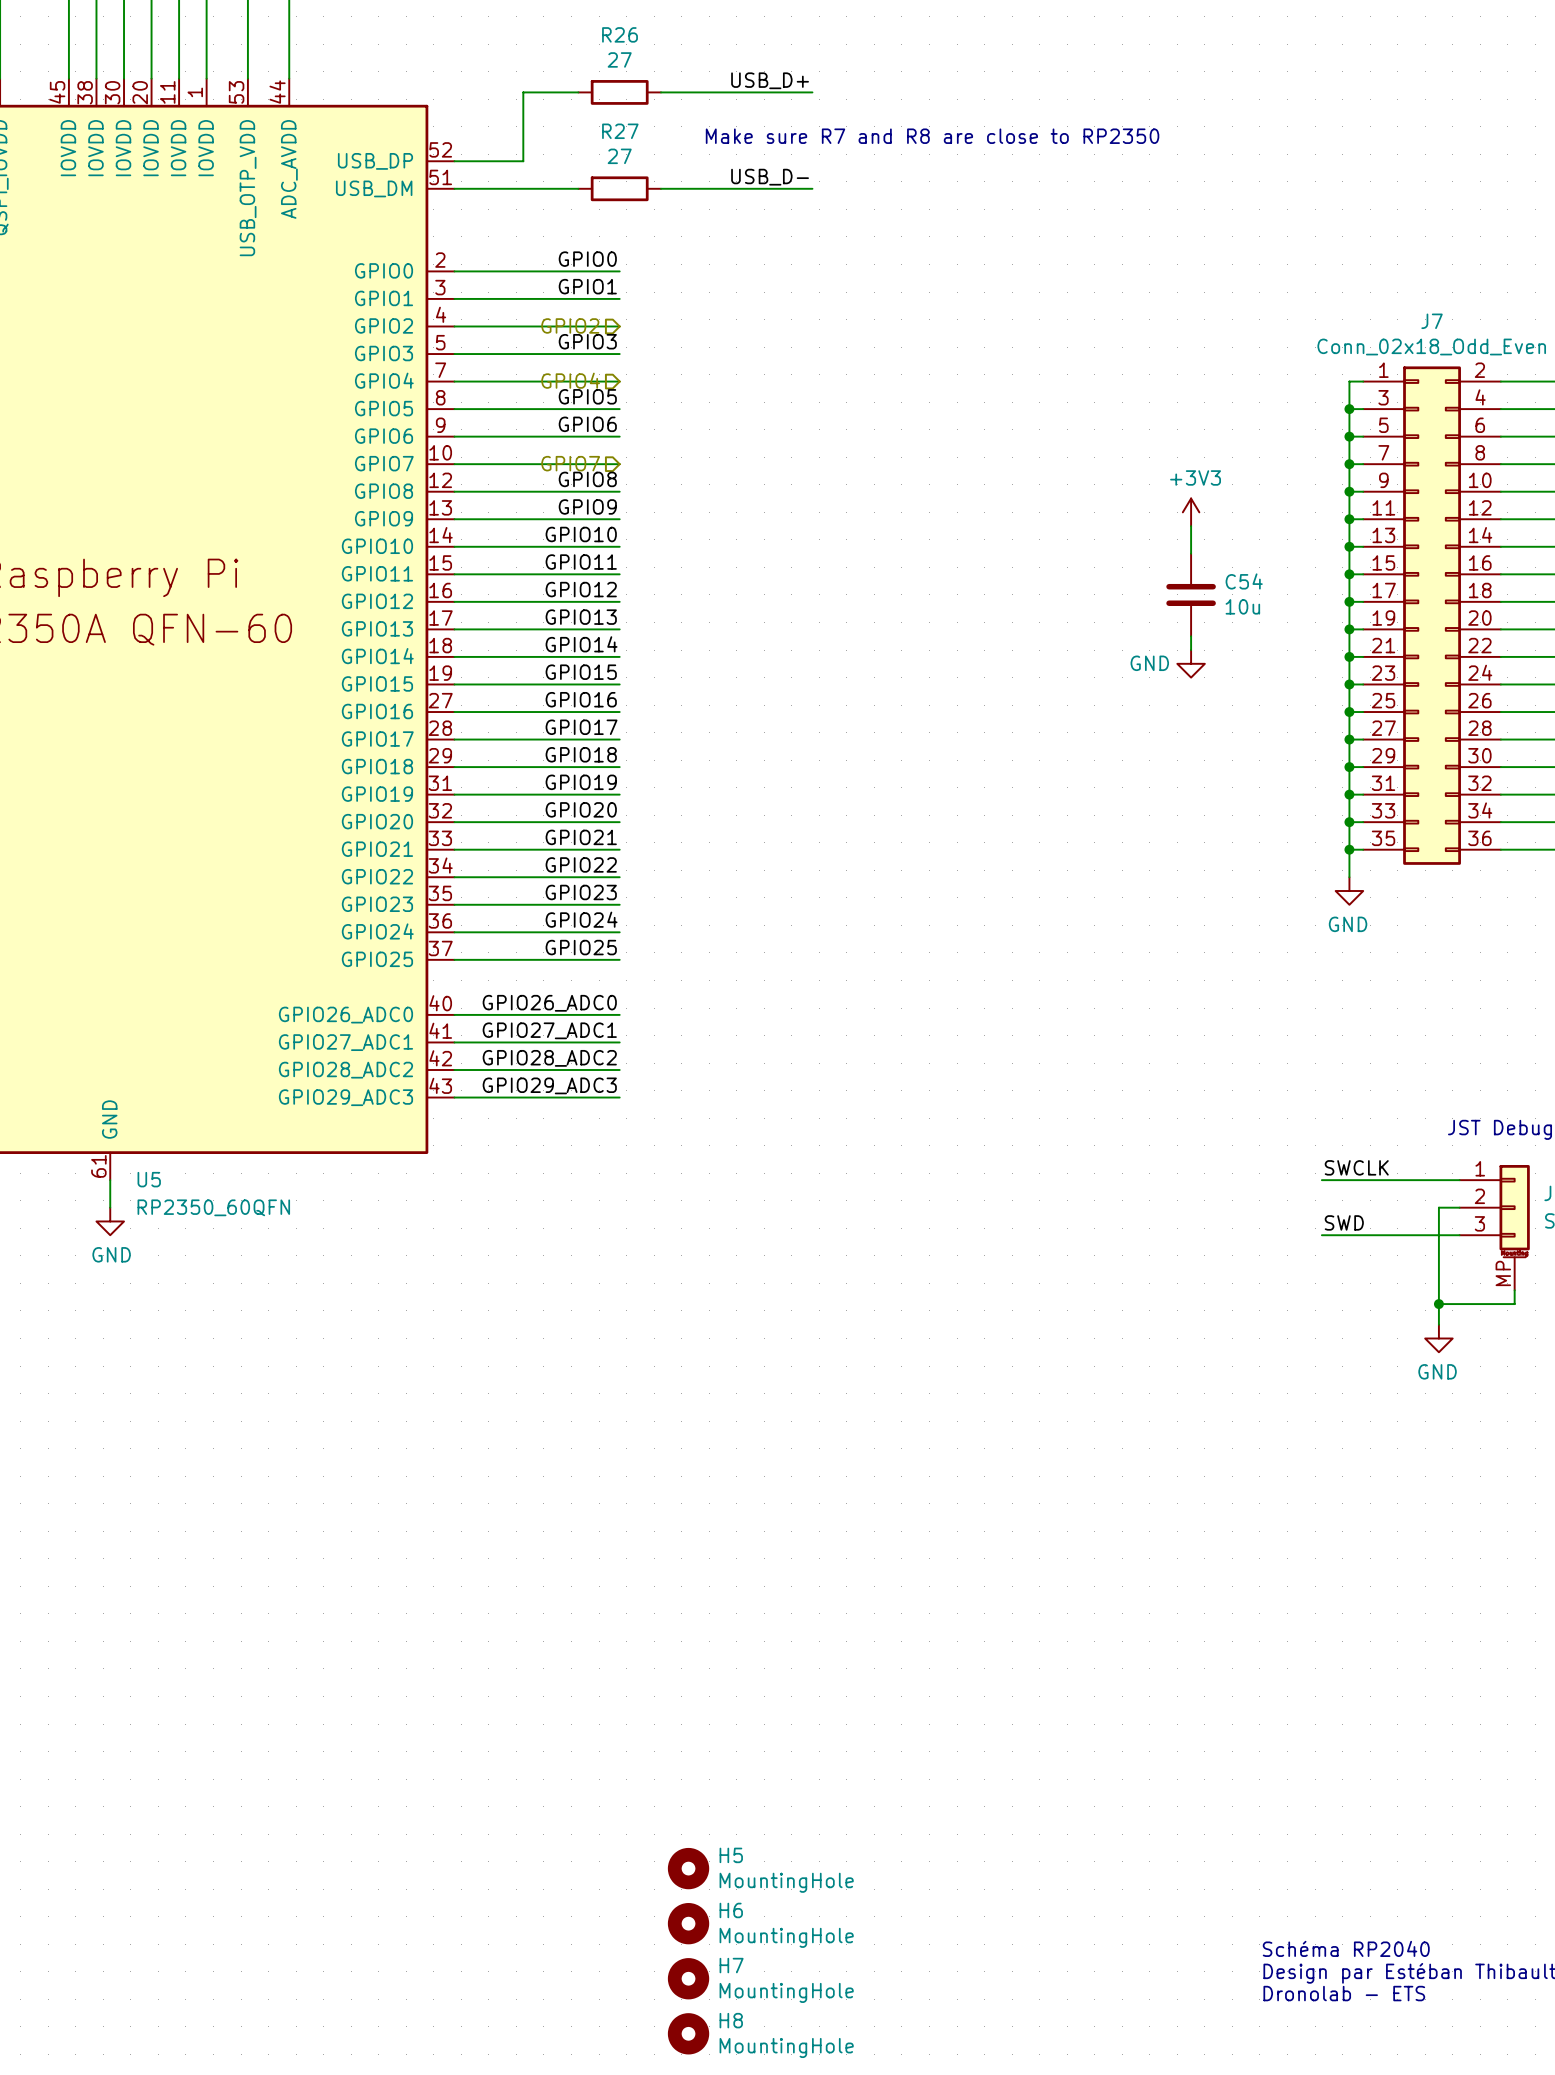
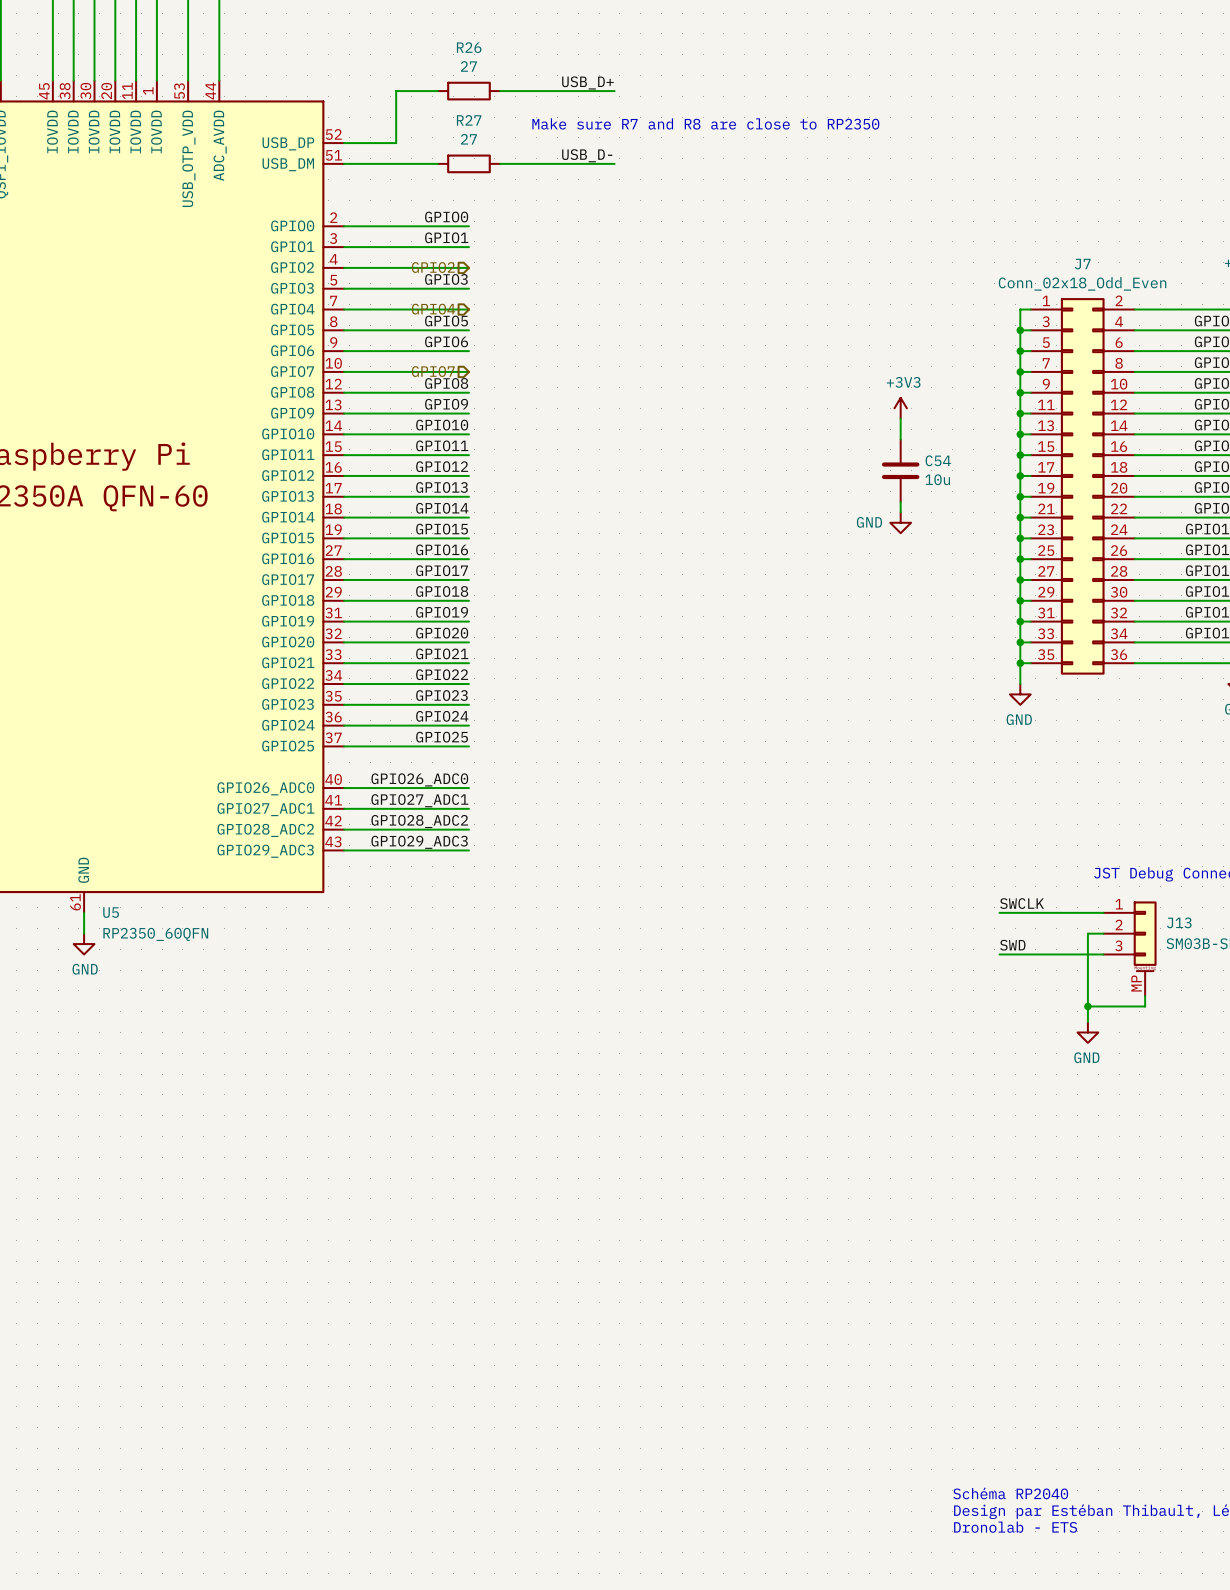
H5: MountingHole (688, 1868) -> none
H6: MountingHole (688, 1923) -> none
H7: MountingHole (688, 1978) -> none
H8: MountingHole (688, 2033) -> none

